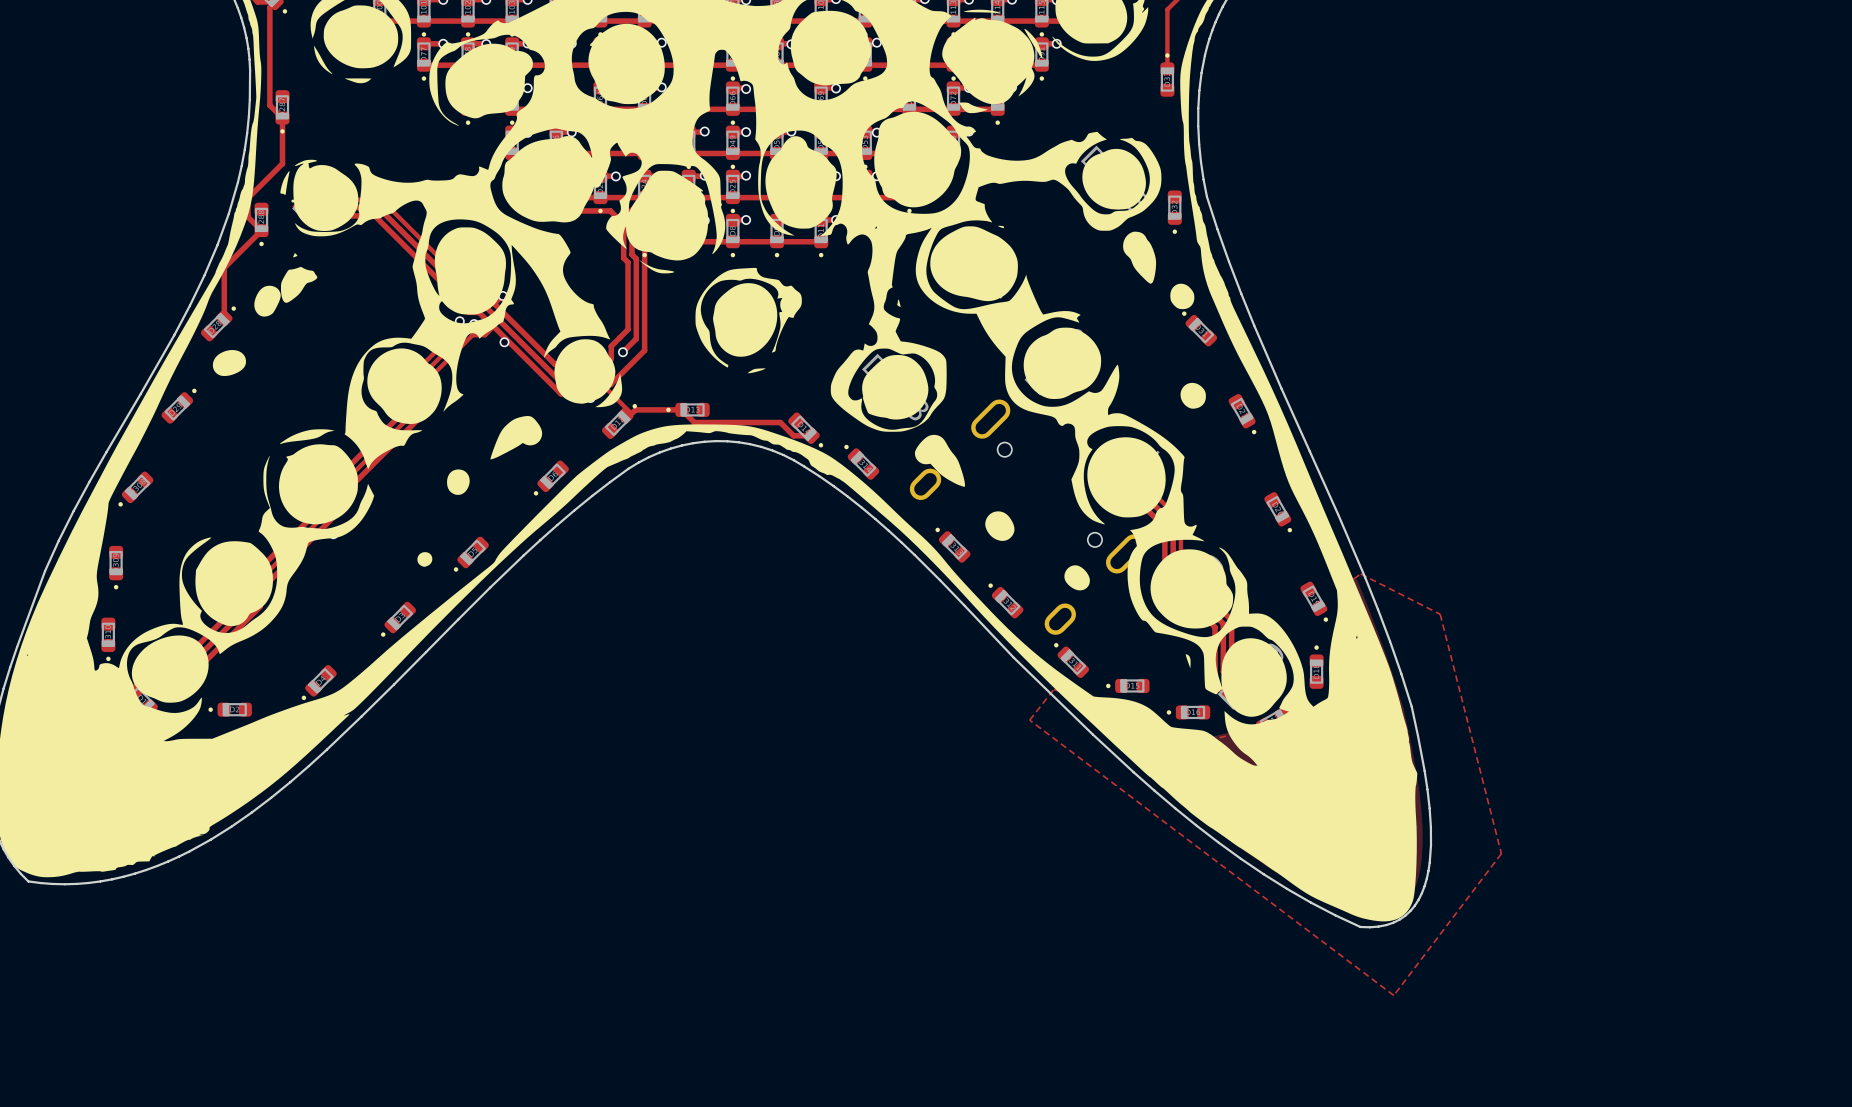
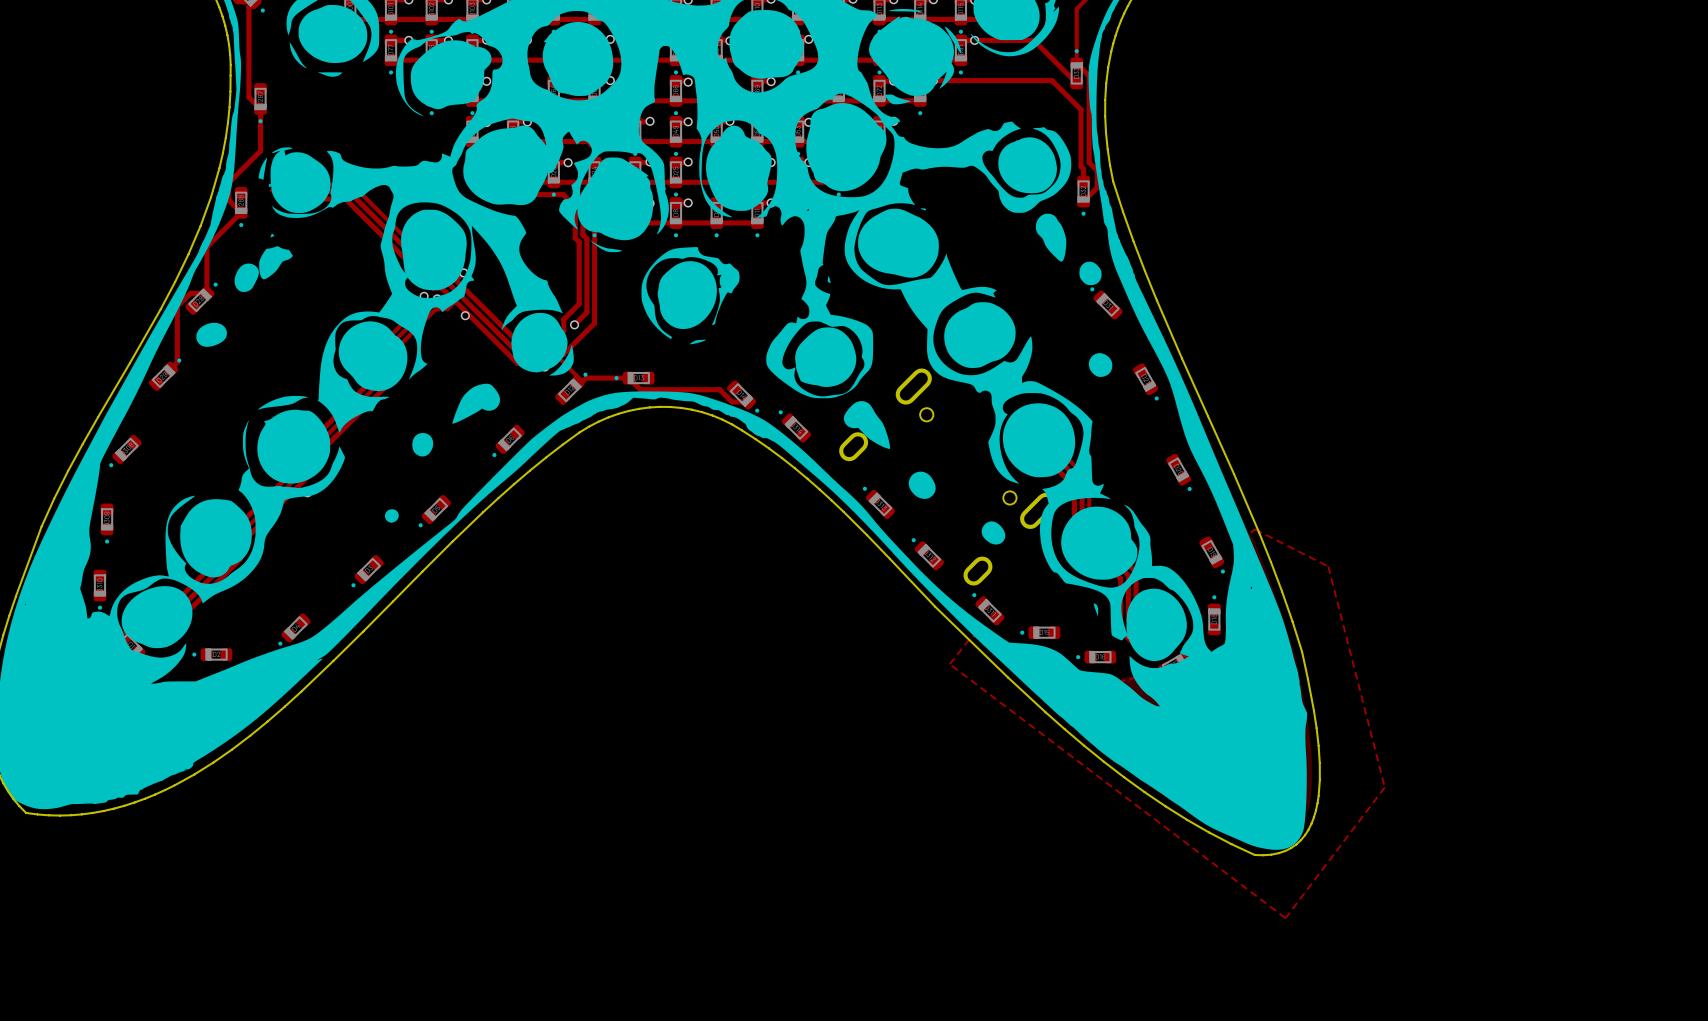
track: none -> (974, 40) (1033, 40) (1076, 83)
track: none -> (1076, 63) (1089, 75) (1089, 162) (1097, 170) (1097, 187) (1083, 201)
track: none -> (933, 80) (1052, 80) (1081, 109) (1081, 166) (1083, 169) (1083, 181)
track: none -> (206, 293) (190, 293) (177, 306) (177, 362) (170, 369)

